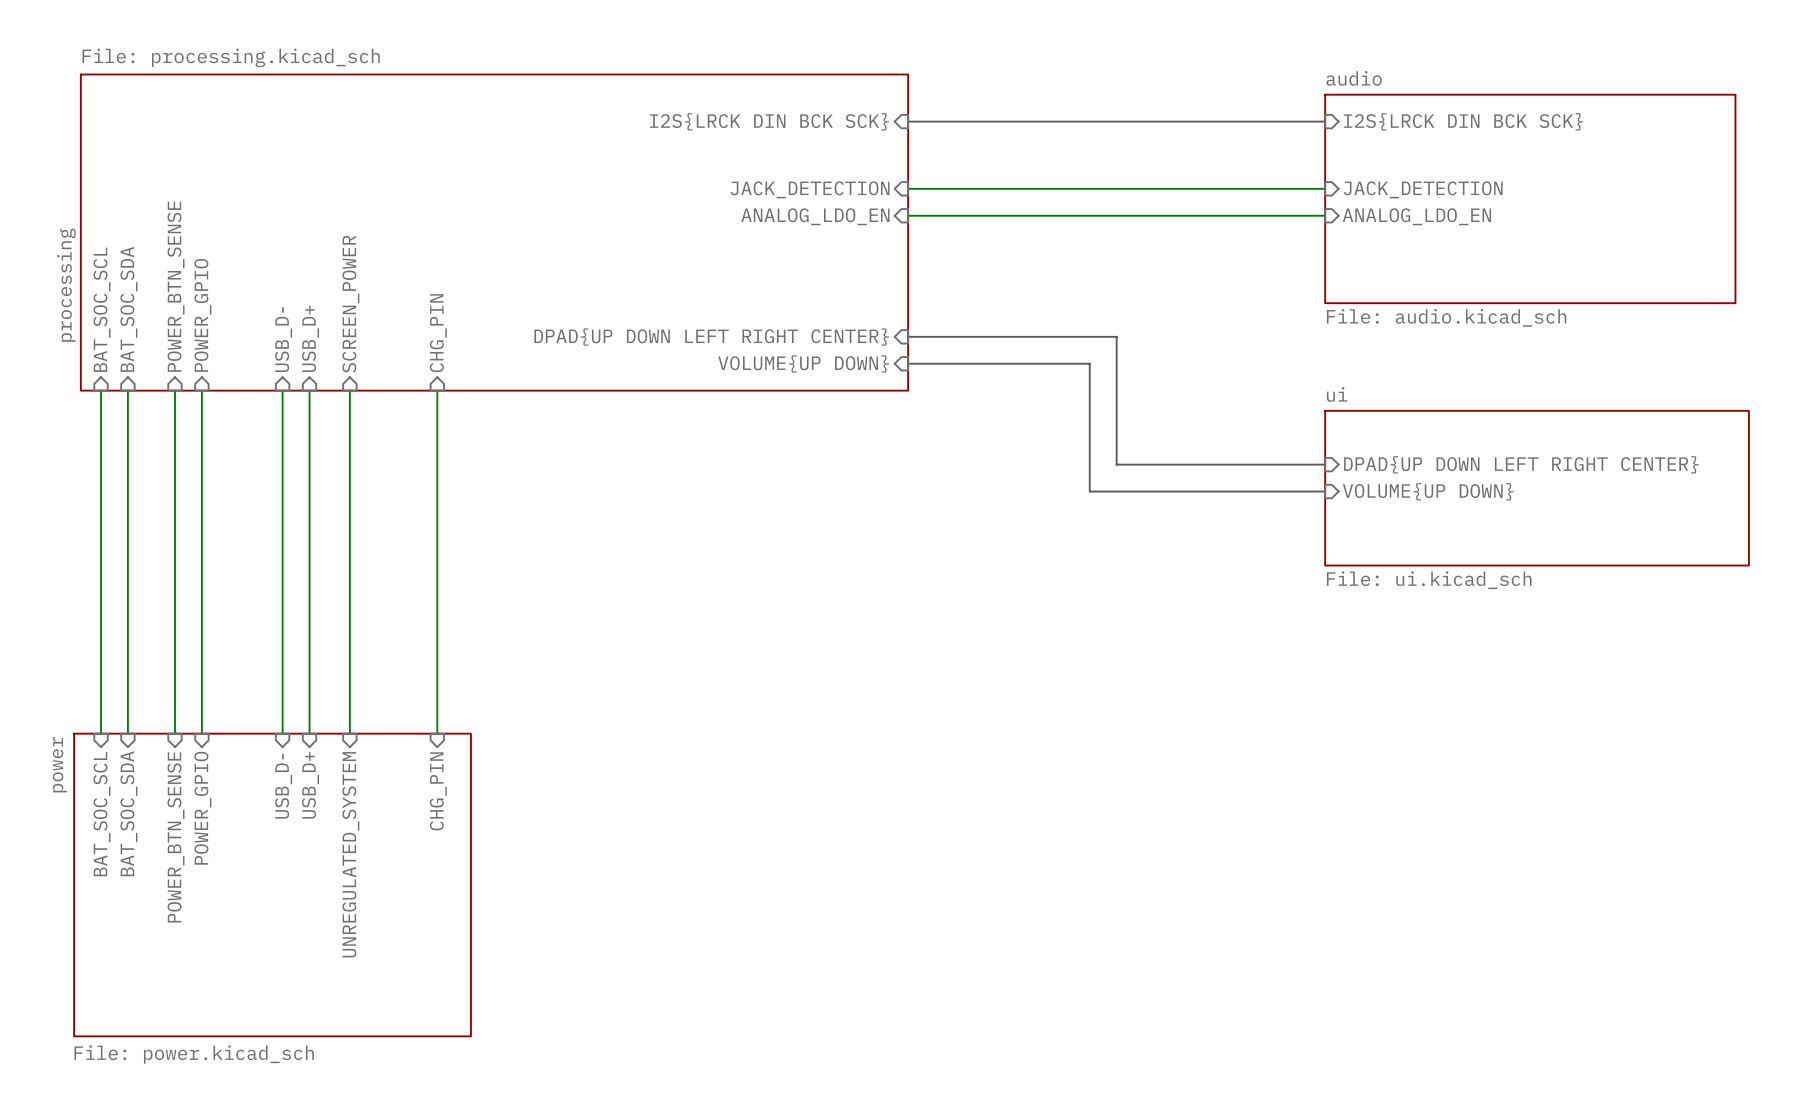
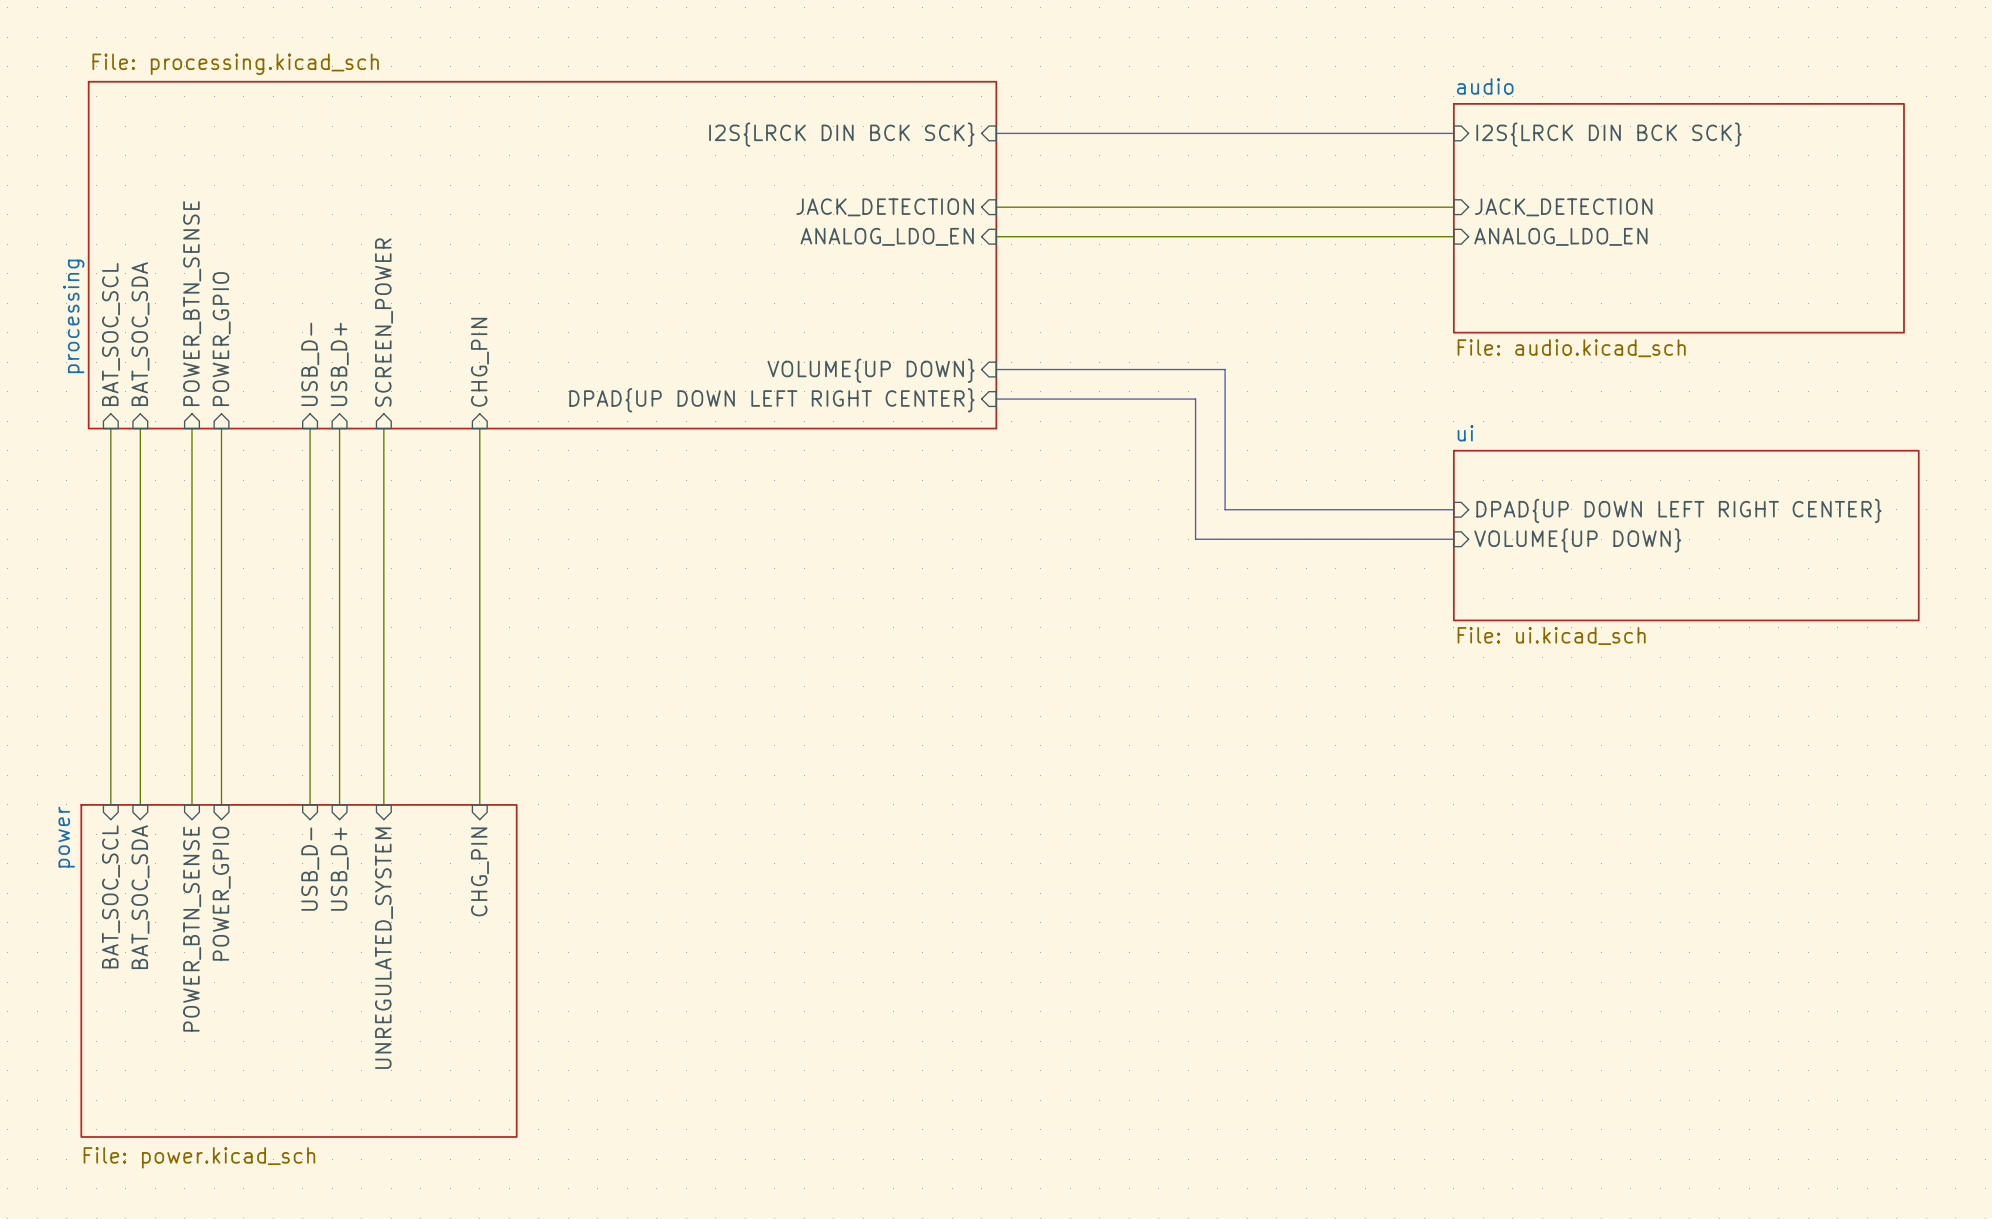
sheet pin: DPAD{UP DOWN LEFT RIGHT CENTER} (711, 337) -> VOLUME{UP DOWN} (871, 370)
sheet pin: VOLUME{UP DOWN} (803, 363) -> DPAD{UP DOWN LEFT RIGHT CENTER} (771, 400)

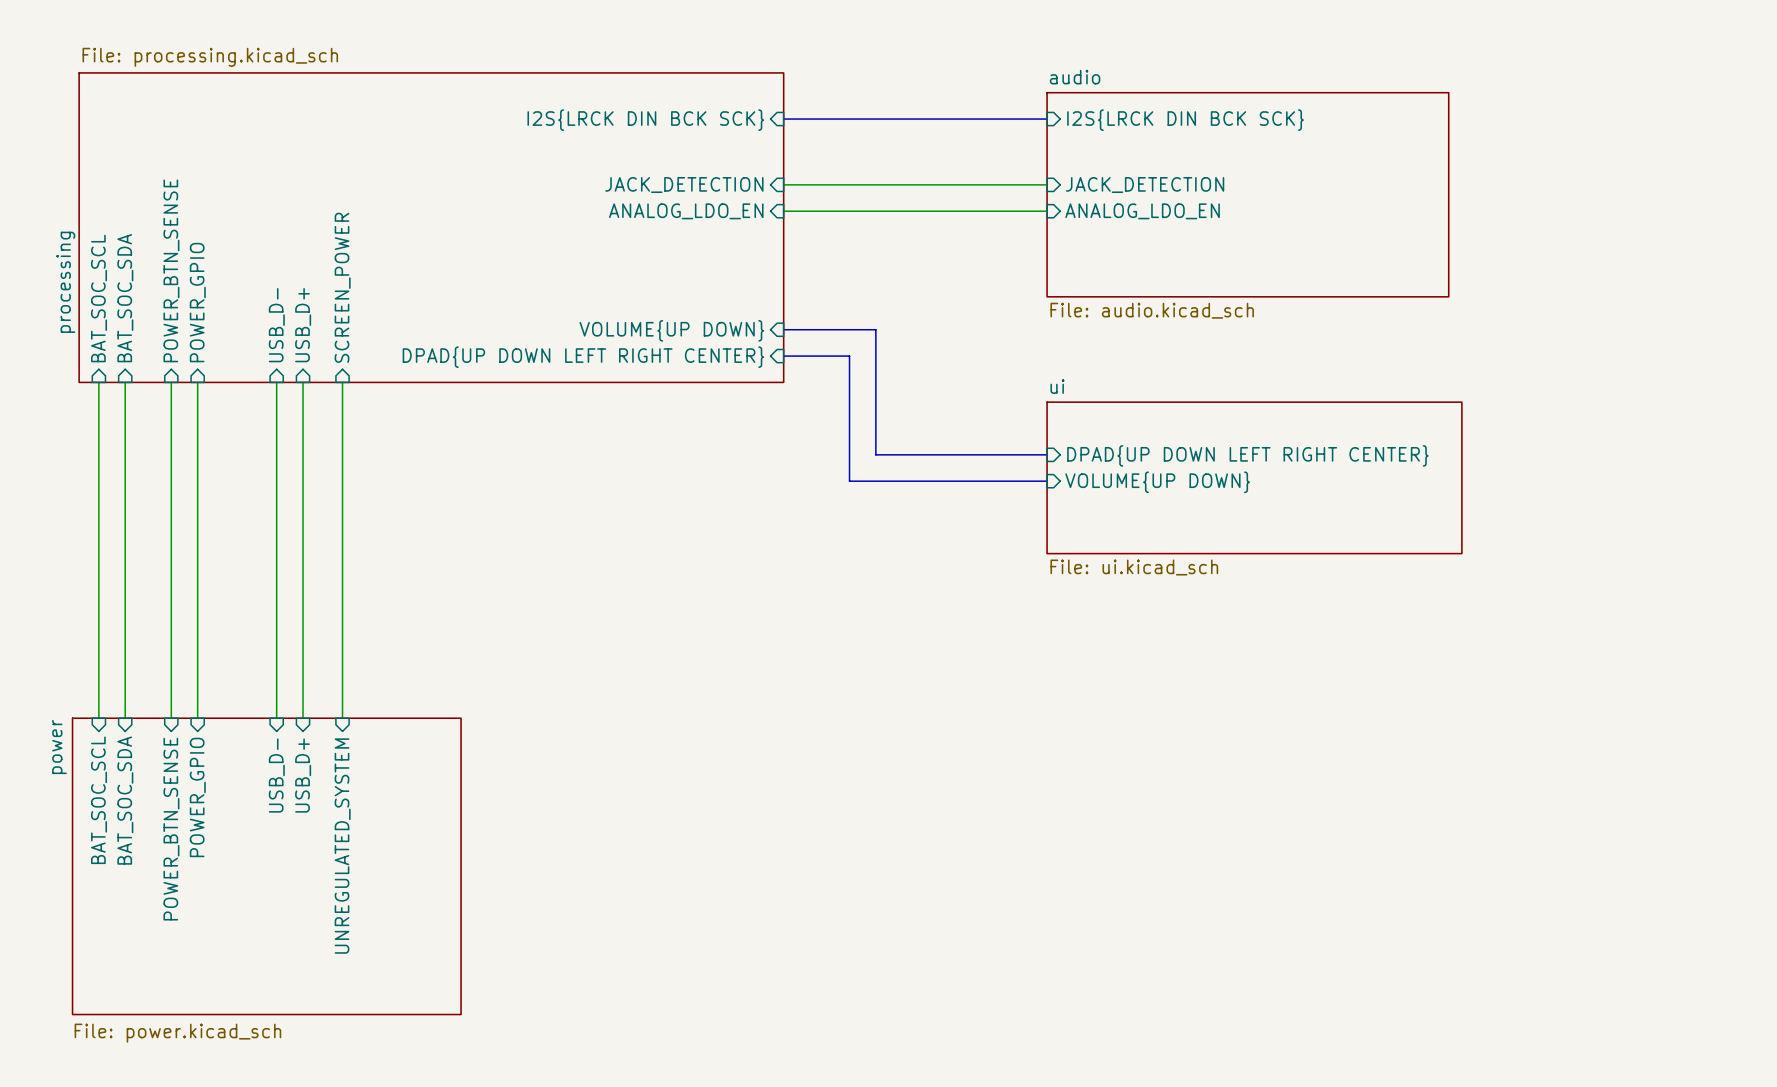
bus: none -> (783, 119) (889, 119)
bus: (1173, 133) (1453, 133) -> none
sheet pin position: I2S{LRCK DIN BCK SCK} (841, 134) -> I2S{LRCK DIN BCK SCK} (645, 120)
sheet pin position: I2S{LRCK DIN BCK SCK} (1609, 134) -> I2S{LRCK DIN BCK SCK} (1185, 120)
wire: none -> (783, 184) (889, 184)
sheet pin position: JACK_DETECTION (885, 207) -> JACK_DETECTION (684, 185)
wire: (1173, 207) (1453, 207) -> none
sheet pin: none -> JACK_DETECTION (1145, 185)
sheet pin: JACK_DETECTION (1563, 207) -> none
sheet audio position: (1678, 218) -> (1247, 194)
wire: none -> (783, 211) (889, 211)
sheet pin position: ANALOG_LDO_EN (887, 236) -> ANALOG_LDO_EN (686, 211)
wire: (1173, 236) (1453, 236) -> none
sheet pin: none -> ANALOG_LDO_EN (1142, 211)
sheet pin: ANALOG_LDO_EN (1560, 236) -> none
sheet processing: none -> File: processing.kicad_sch (431, 227)
sheet processing: File: processing.kicad_sch (542, 255) -> none
sheet pin: CHG_PIN (479, 362) -> none
bus: none -> (783, 329) (875, 329) (875, 454) (1047, 454)
bus: (996, 369) (1225, 369) (1225, 509) (1453, 509) -> none
sheet pin position: VOLUME{UP DOWN} (871, 370) -> VOLUME{UP DOWN} (671, 330)
bus: none -> (783, 356) (849, 356) (849, 481) (1047, 481)
bus: (996, 399) (1195, 399) (1195, 539) (1453, 539) -> none
sheet pin position: DPAD{UP DOWN LEFT RIGHT CENTER} (771, 400) -> DPAD{UP DOWN LEFT RIGHT CENTER} (583, 357)
wire: (479, 428) (479, 804) -> none
sheet pin position: DPAD{UP DOWN LEFT RIGHT CENTER} (1678, 510) -> DPAD{UP DOWN LEFT RIGHT CENTER} (1247, 455)
sheet ui position: (1686, 535) -> (1254, 477)
sheet pin: none -> VOLUME{UP DOWN} (1157, 482)
sheet pin: VOLUME{UP DOWN} (1577, 540) -> none
sheet pin: CHG_PIN (479, 871) -> none

